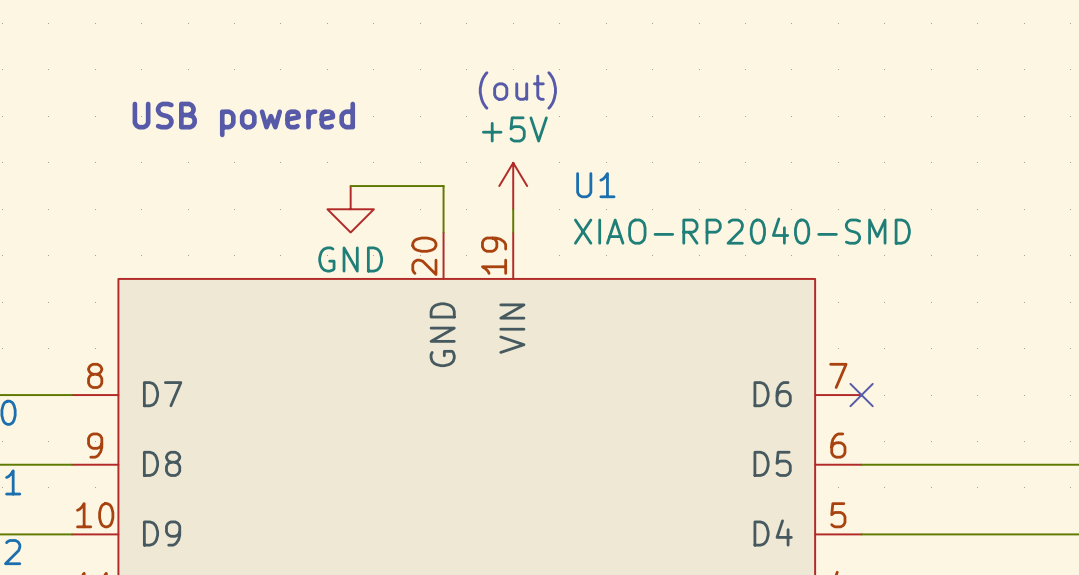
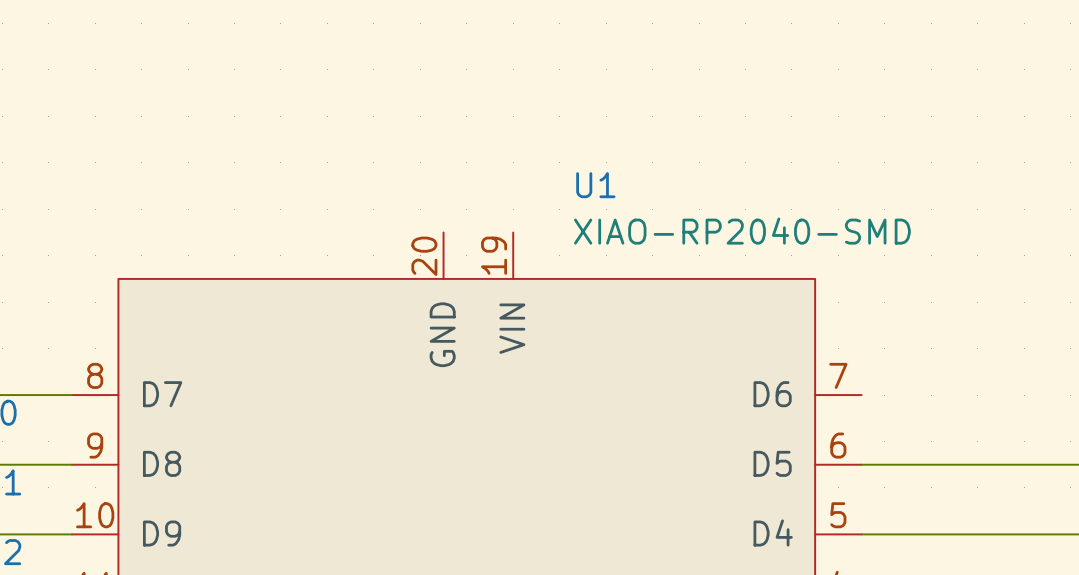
text: (out) (517, 90) -> none
text: USB powered (243, 119) -> none
wire: (350, 186) (443, 186) (443, 232) -> none
power symbol: +5V (513, 186) -> none
power symbol: GND (350, 209) -> none
wire: (513, 209) (513, 232) -> none
no-connect mark: (861, 395) -> none

